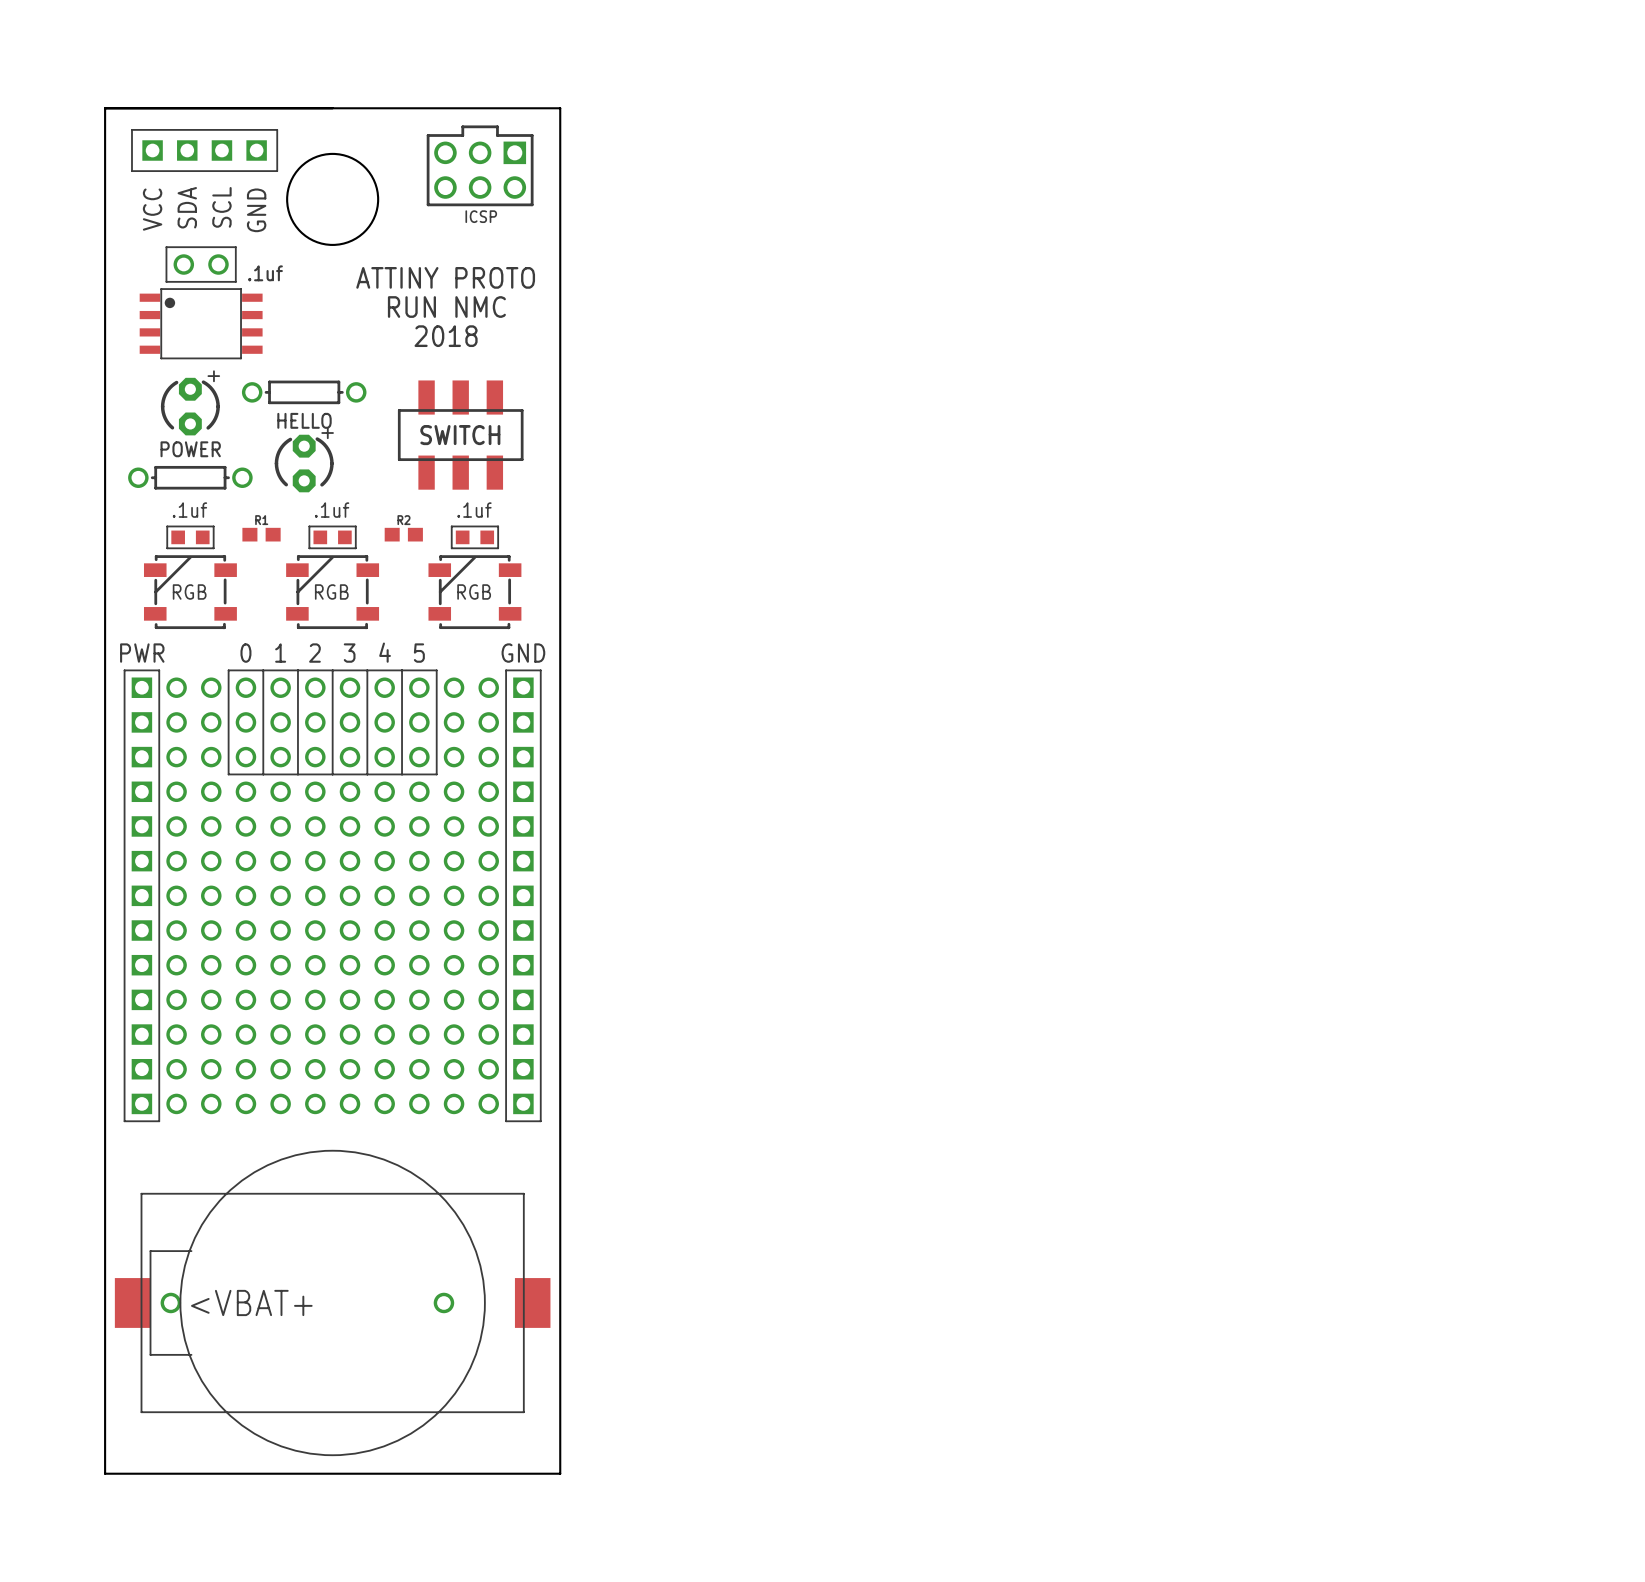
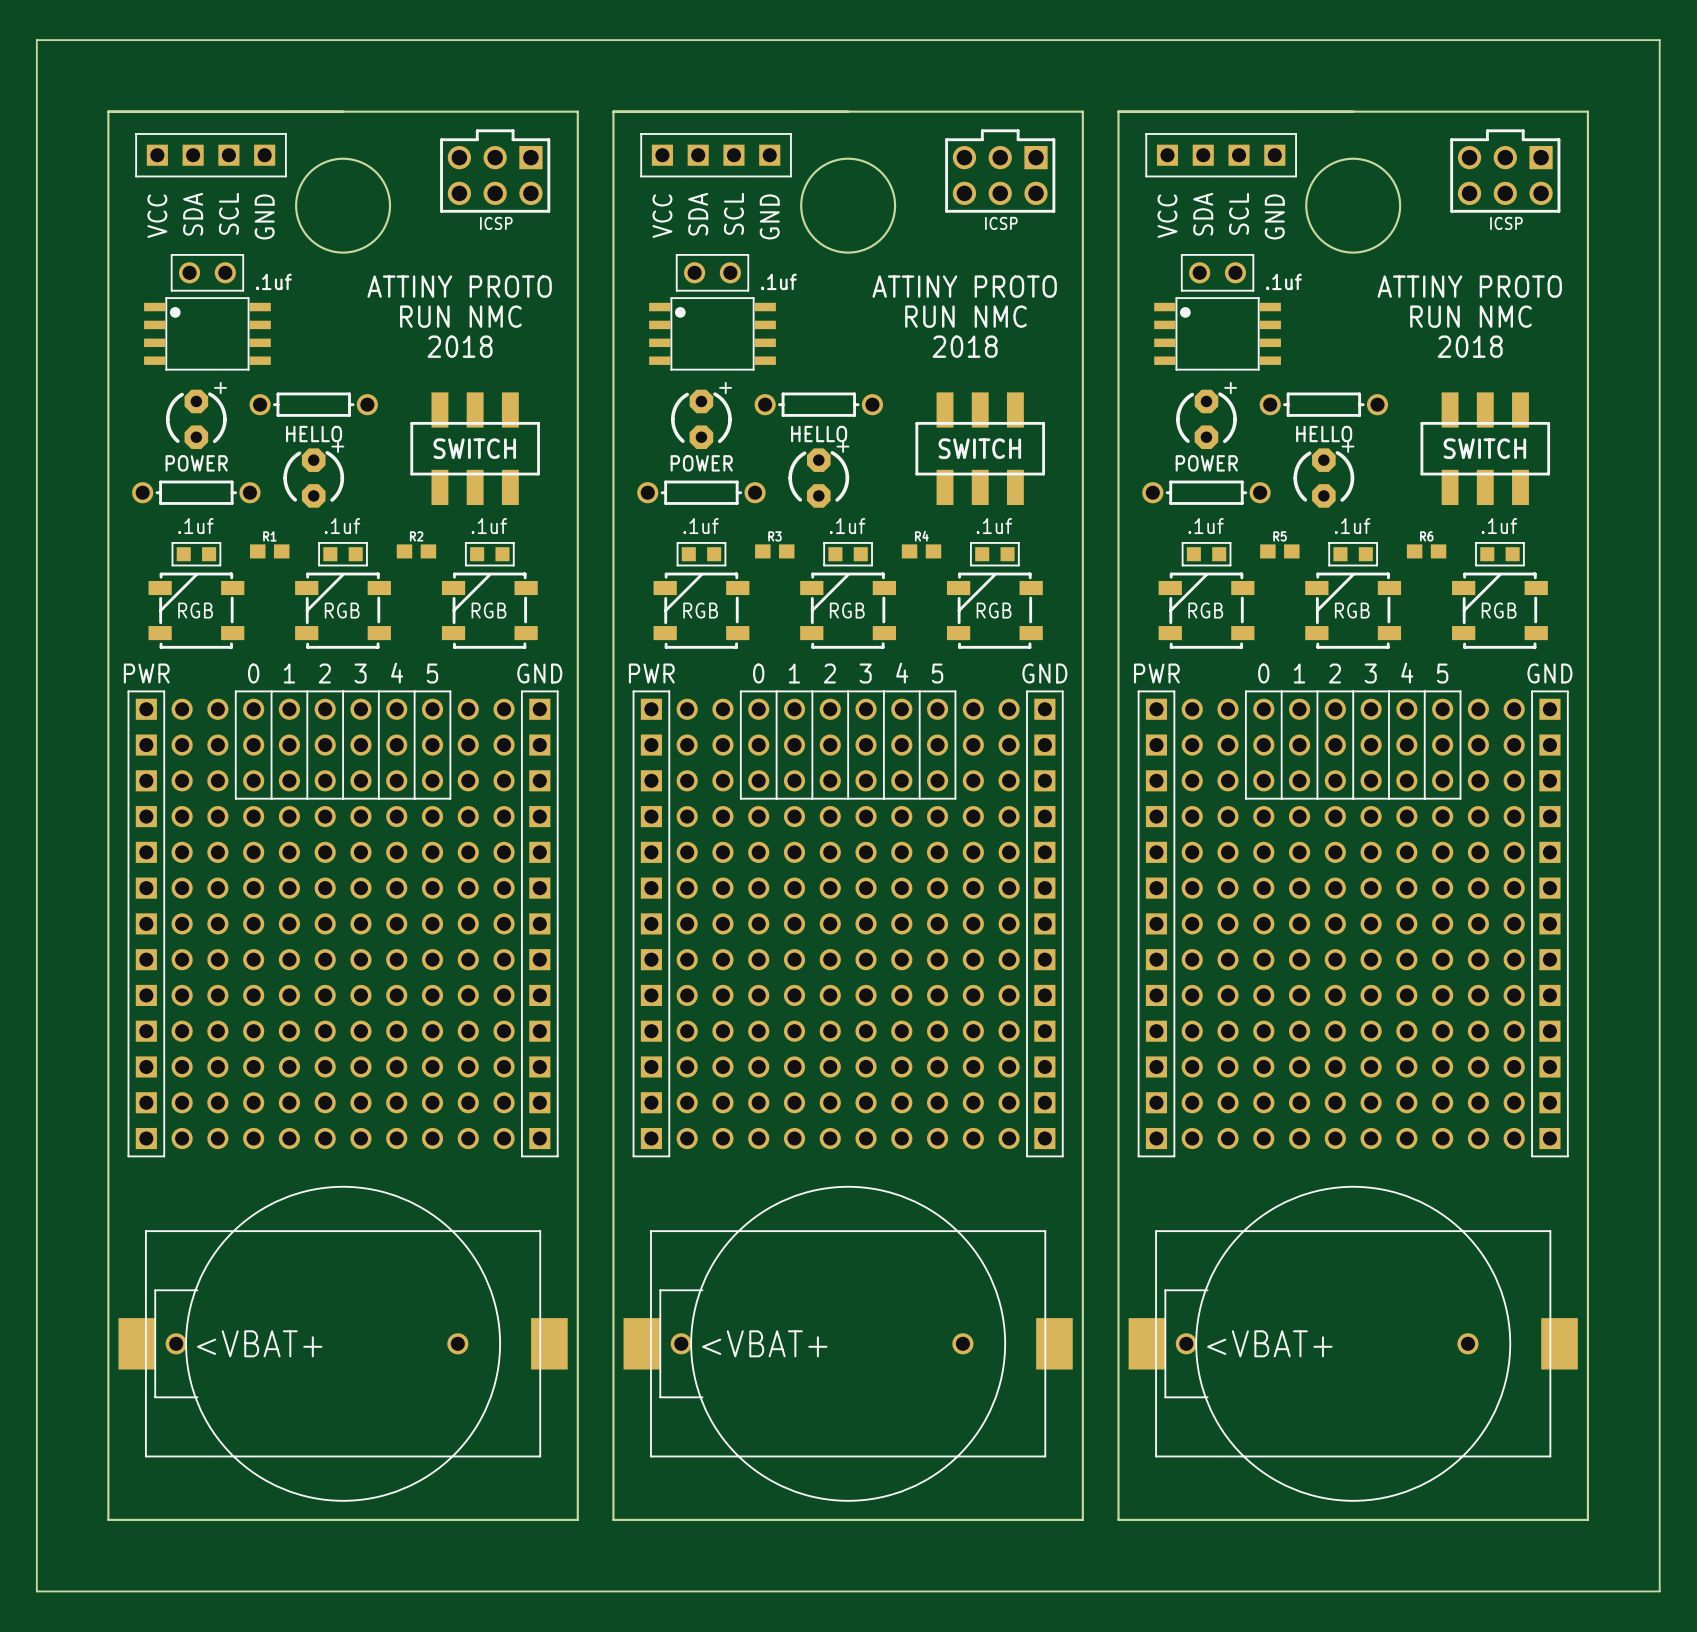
board edge: none -> (36, 40) (1659, 40) (1659, 1591) (36, 1591) (36, 40)
board edge: none -> (613, 111) (1082, 111) (1082, 1519) (613, 1519) (613, 111)
board edge: none -> (1118, 111) (1587, 111) (1587, 1519) (1118, 1519) (1118, 111)
part: none -> (716, 155)
part: none -> (1221, 155)
round board edge: none -> [800, 157, 897, 254]
round board edge: none -> [1305, 157, 1402, 254]
part: none -> (1000, 171)
part: none -> (1505, 171)
part: none -> (712, 272)
part: none -> (1217, 272)
text: none -> .1uf (778, 281)
text: none -> .1uf (1283, 281)
text: none -> ATTINY PROTO (964, 286)
text: none -> ATTINY PROTO (1469, 286)
text: none -> RUN NMC (965, 316)
text: none -> RUN NMC (1471, 316)
part: none -> (712, 333)
part: none -> (1217, 333)
text: none -> 2018 (965, 346)
text: none -> 2018 (1470, 346)
part: none -> (818, 404)
part: none -> (1323, 404)
part: none -> (701, 415)
part: none -> (1206, 415)
text: none -> HELLO (819, 434)
text: none -> HELLO (1324, 434)
part: none -> (980, 448)
part: none -> (1485, 448)
text: none -> POWER (701, 463)
text: none -> POWER (1206, 463)
part: none -> (818, 474)
part: none -> (1323, 474)
part: none -> (701, 492)
part: none -> (1206, 492)
R3: none -> (774, 551)
R4: none -> (921, 551)
R5: none -> (1279, 551)
R6: none -> (1426, 551)
part: none -> (701, 595)
part: none -> (848, 595)
part: none -> (994, 595)
part: none -> (1206, 595)
part: none -> (1353, 595)
part: none -> (1499, 595)
part: none -> (848, 923)
part: none -> (1353, 923)
part: none -> (832, 1343)
part: none -> (848, 1343)
part: none -> (1337, 1343)
part: none -> (1353, 1343)

